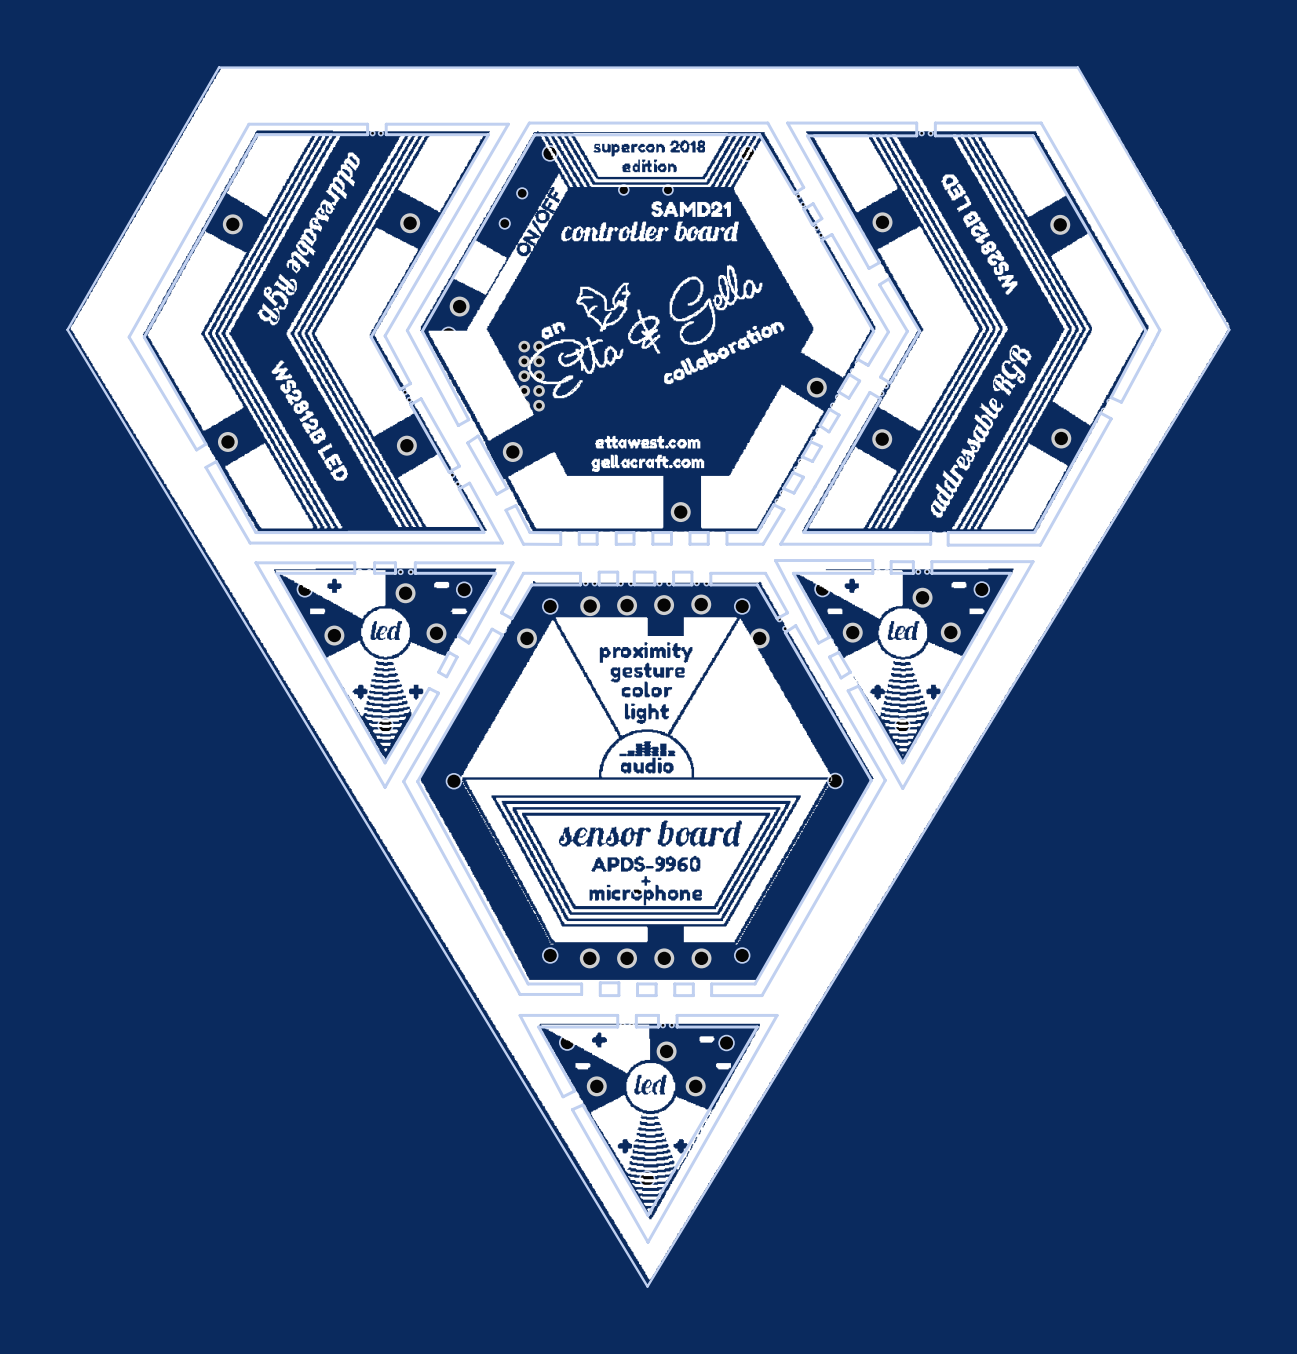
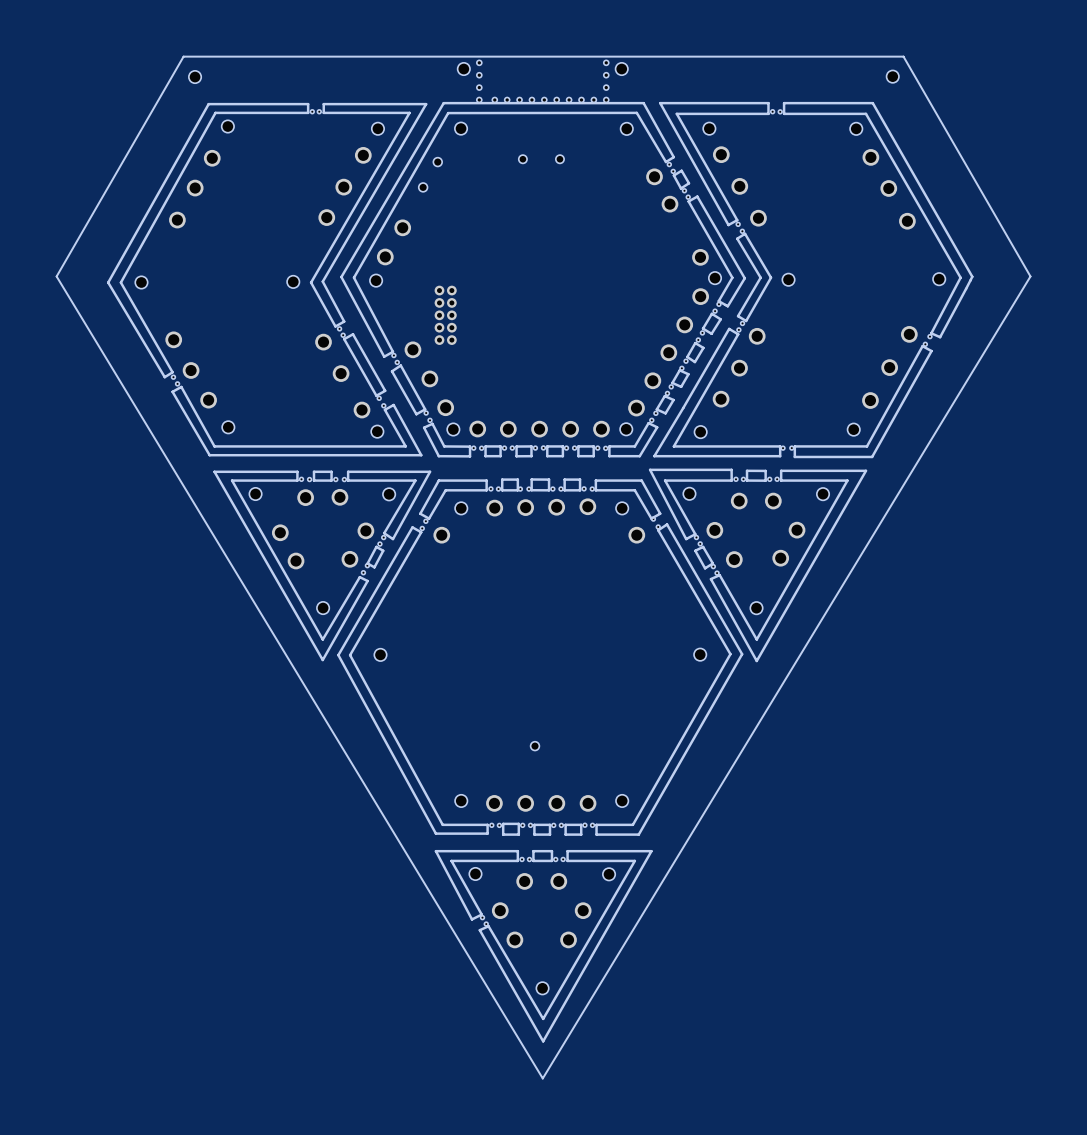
drawing: [70, 67, 1230, 1280] -> none

